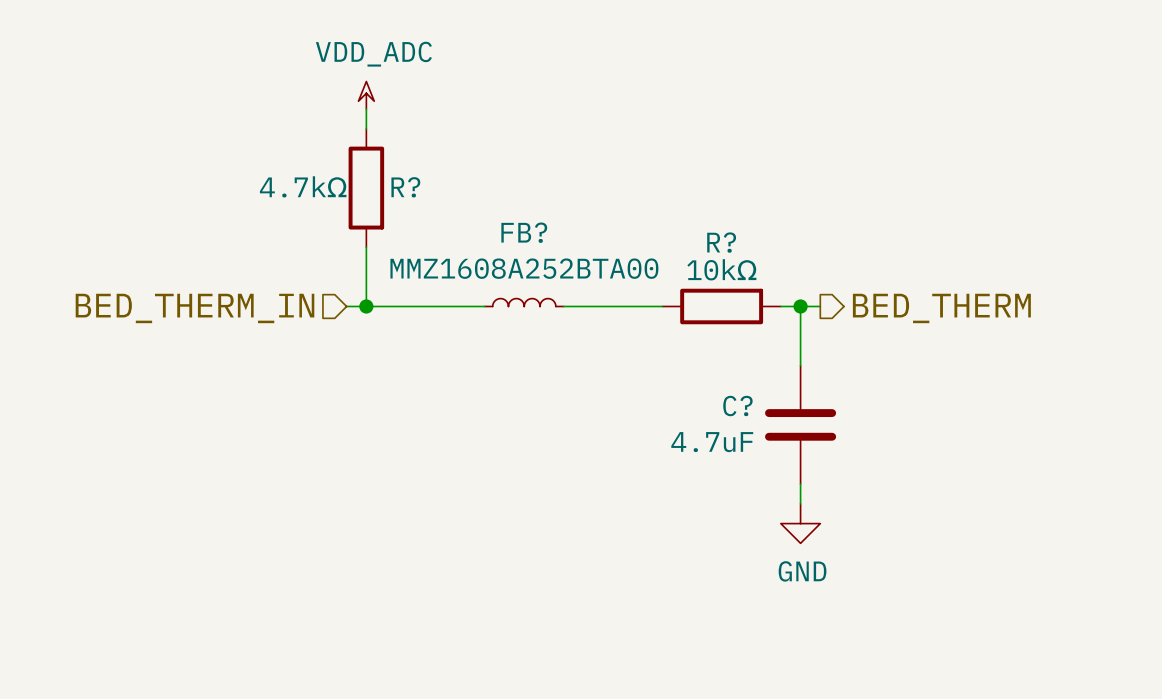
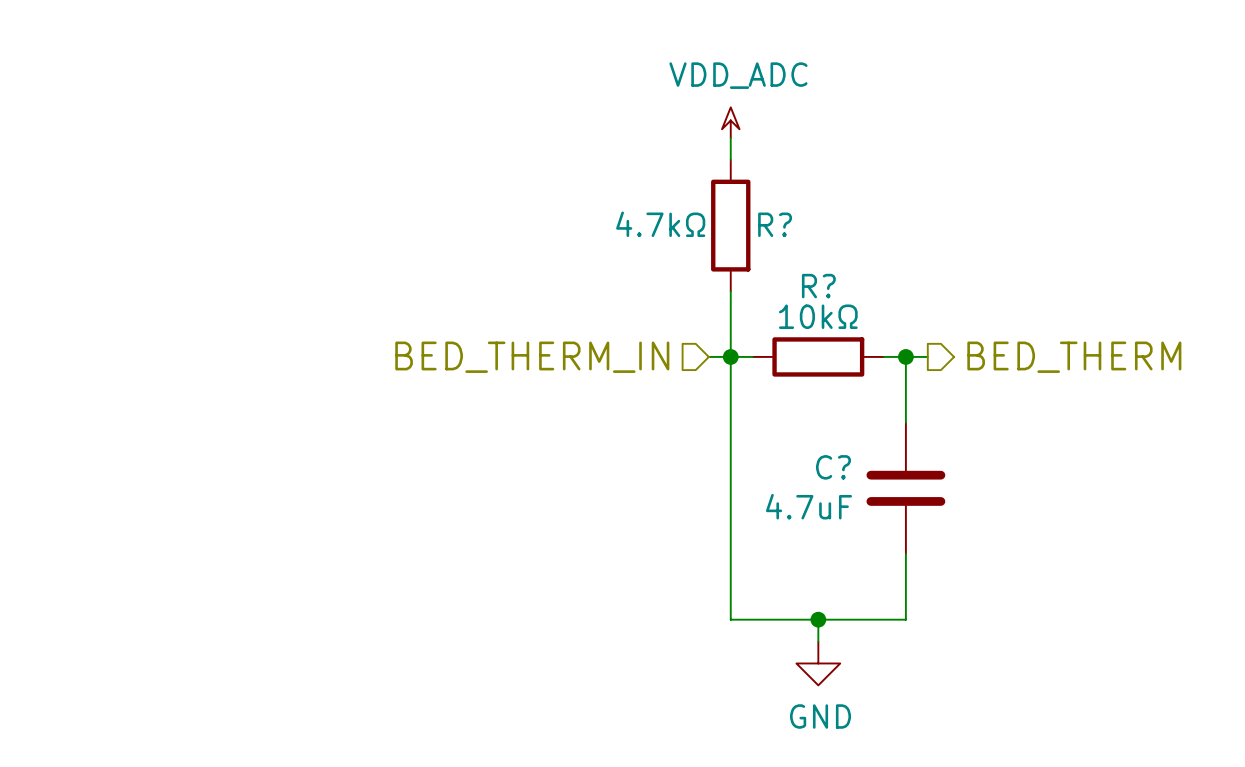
power symbol position: VDD_ADC (366, 95) -> VDD_ADC (730, 122)
wire: (366, 109) (366, 128) -> (730, 138) (730, 159)
R? position: (366, 188) -> (730, 225)
wire: (366, 247) (366, 306) -> none
wire: none -> (730, 291) (730, 619) (905, 619) (905, 575)
FB?: MMZ1608A252BTA00 (524, 302) -> none
wire: (346, 306) (484, 306) -> none
junction: (366, 306) -> none
wire: (563, 306) (622, 306) -> none
junction: none -> (730, 356)
hierarchical label position: BED_THERM_IN (195, 308) -> BED_THERM_IN (532, 357)
power symbol position: GND (800, 523) -> GND (818, 663)
wire: none -> (818, 619) (818, 641)
junction: none -> (818, 619)

